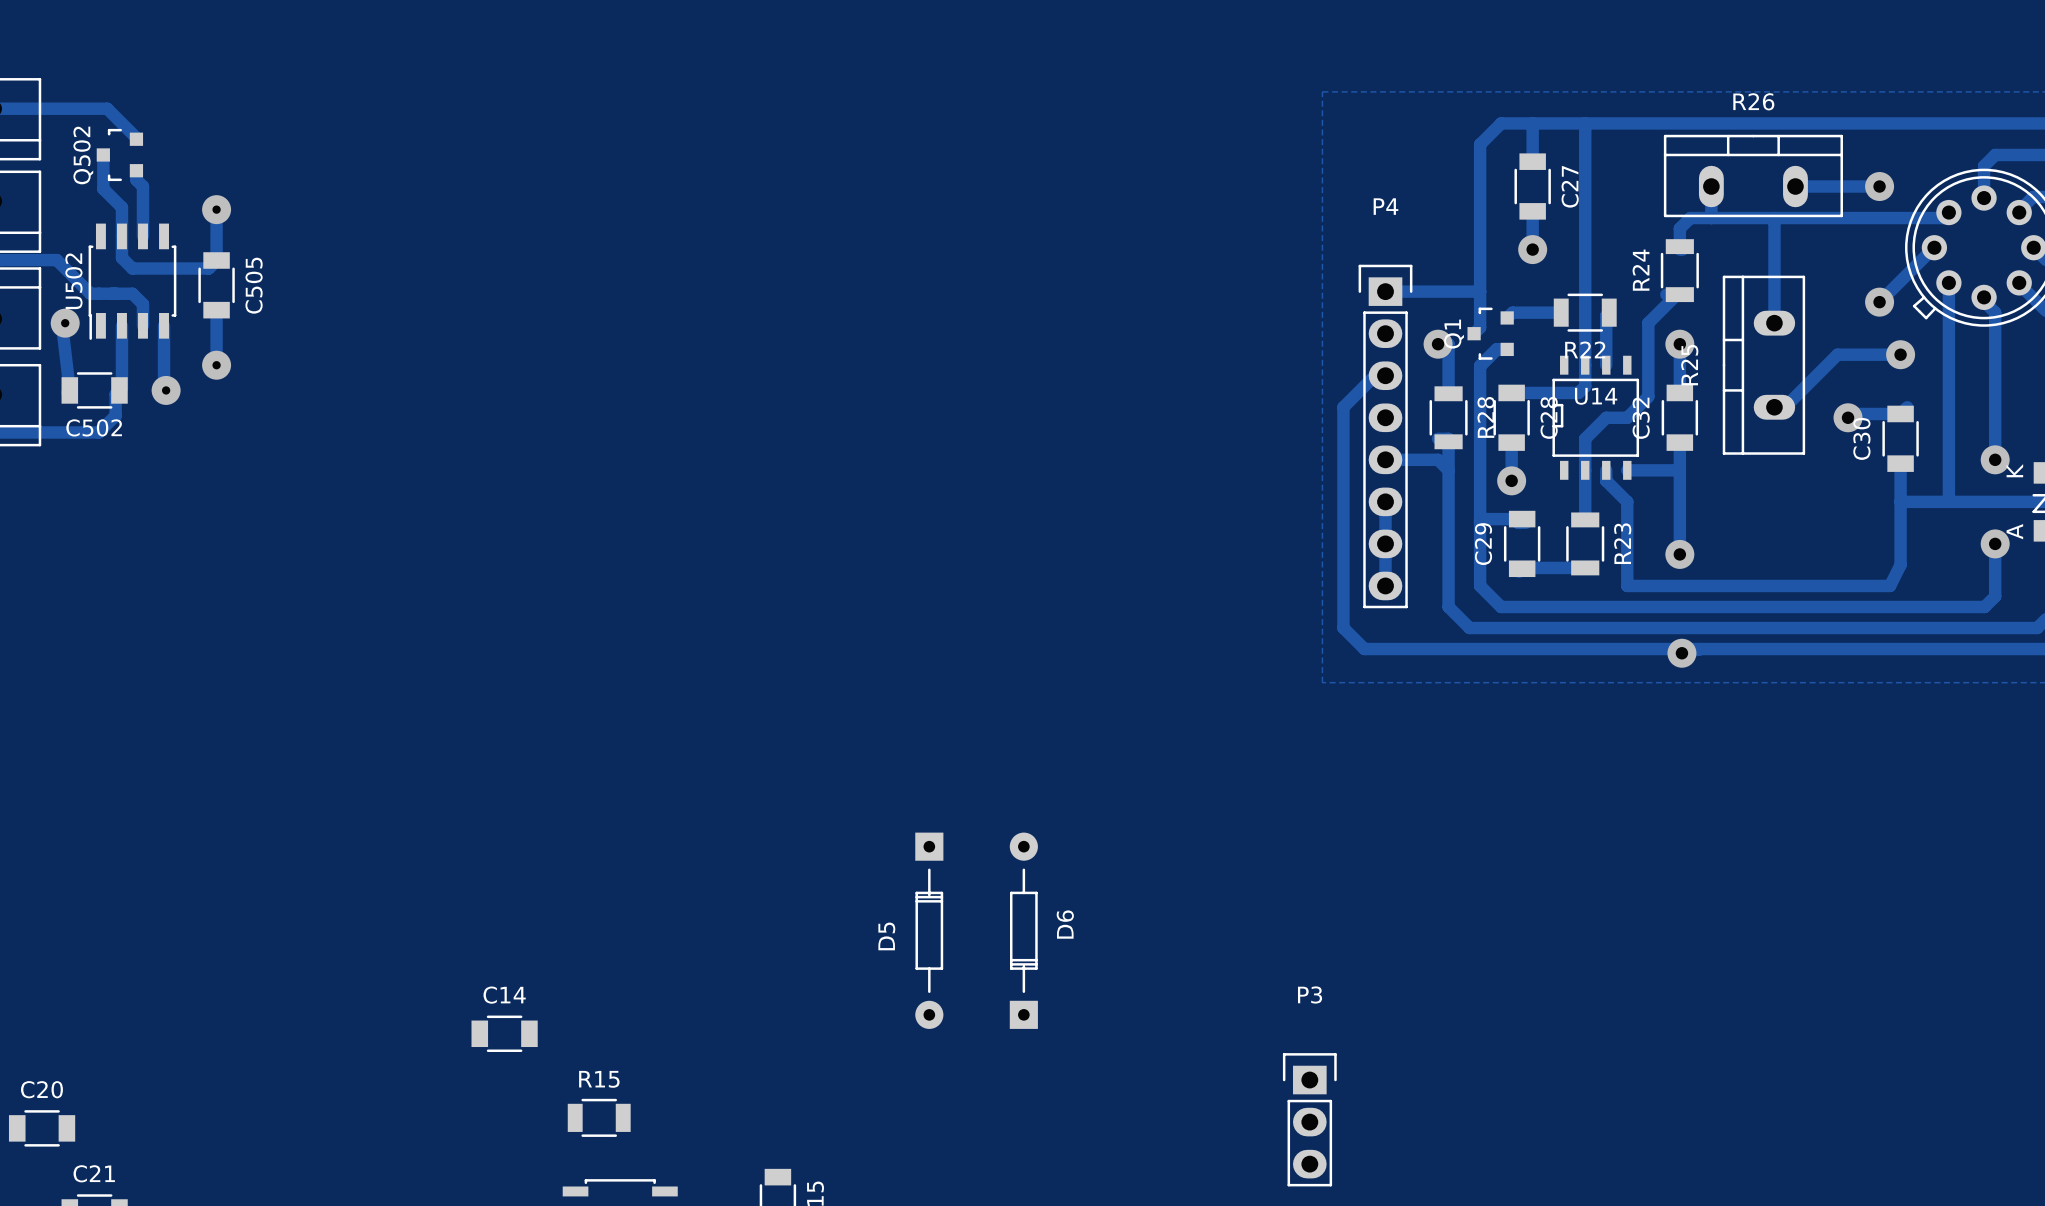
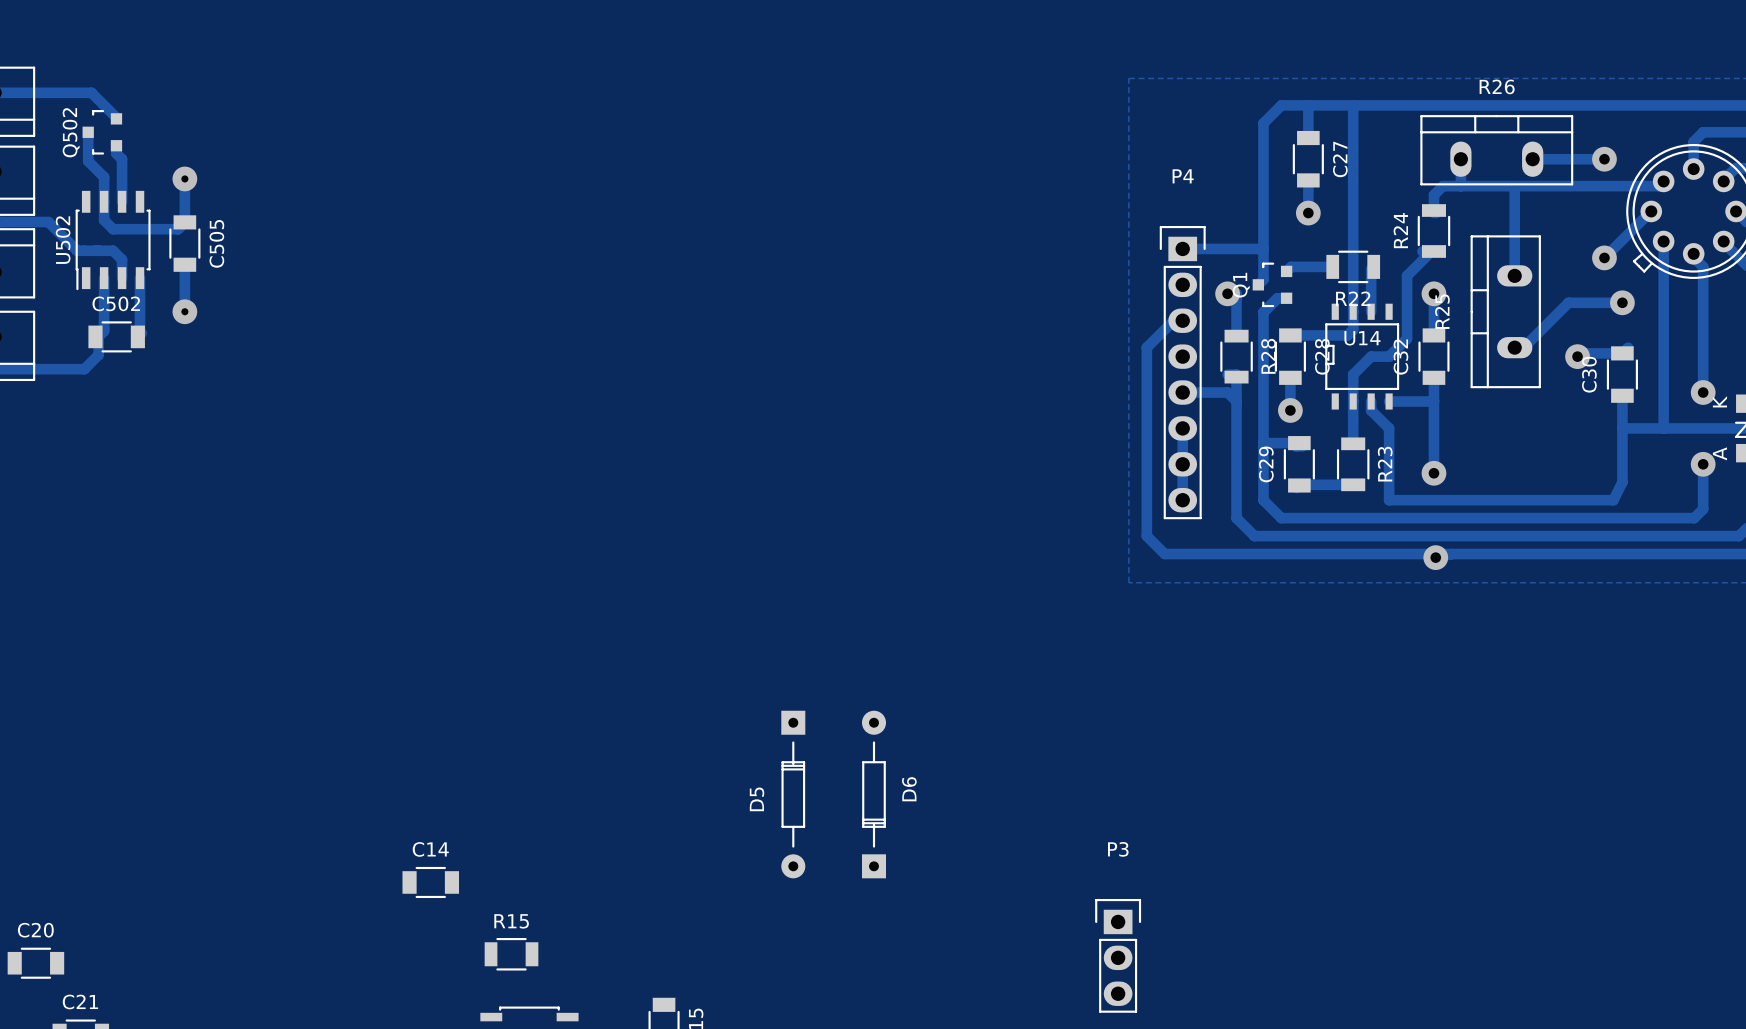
track: (65, 323) (61, 319) (69, 390) (67, 392) -> none
via: (65, 323) -> none
C502 position: (94, 390) -> (116, 336)
via: (166, 390) -> none
C502 name position: C502 (94, 427) -> C502 (116, 303)

